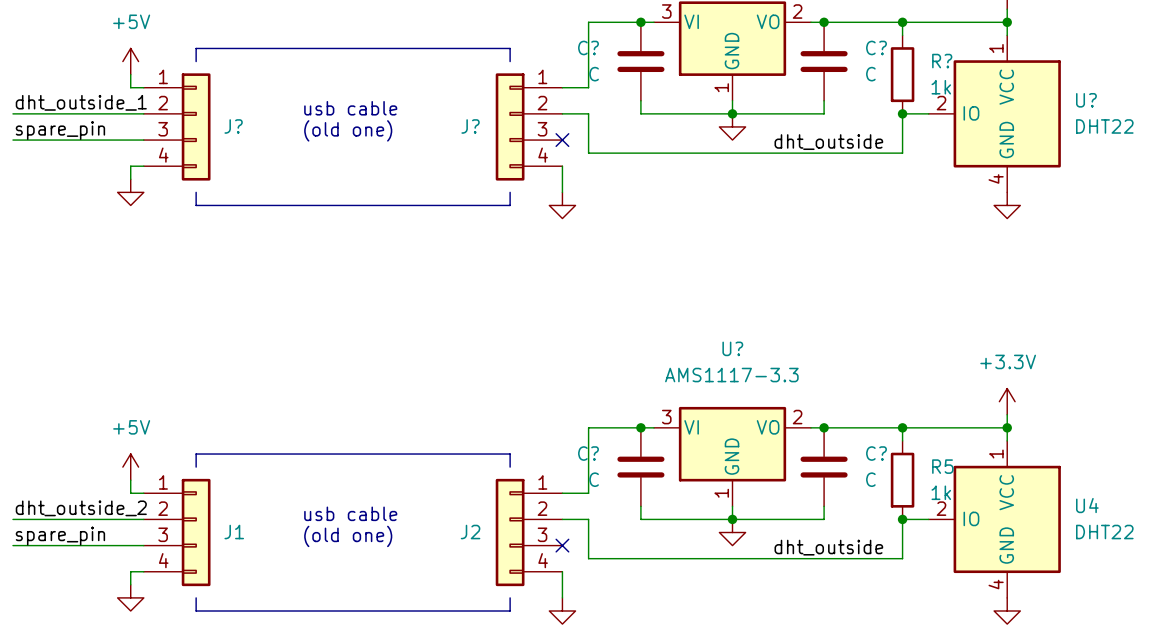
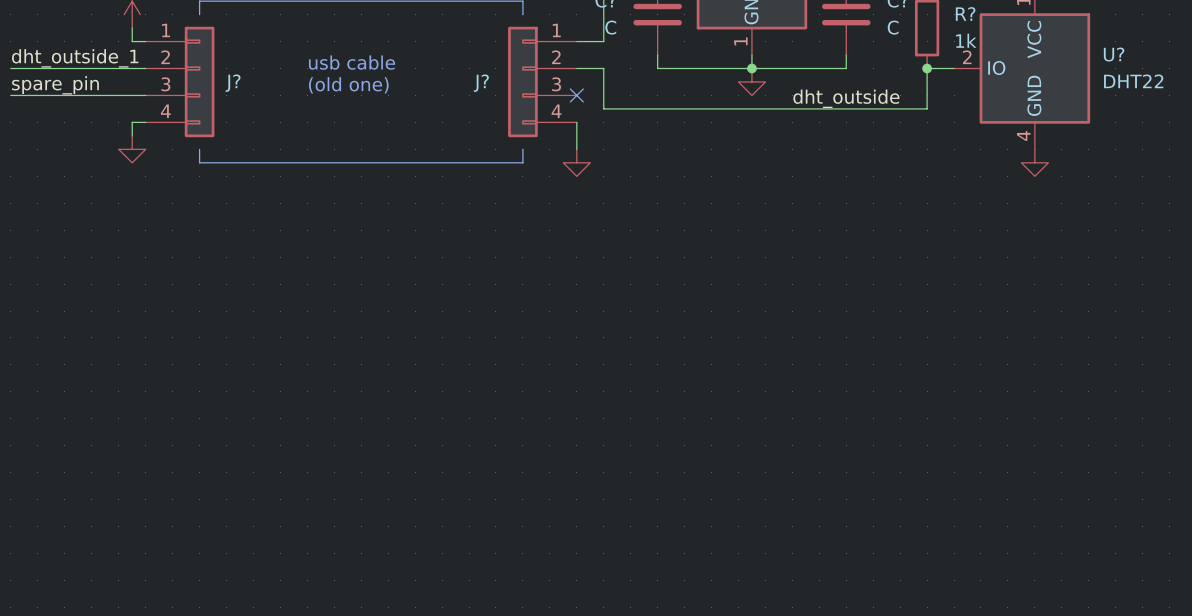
power symbol: +3.3V (1007, 401) -> none
wire: (1007, 414) (1007, 440) -> none
junction: (640, 427) -> none
wire: (654, 427) (588, 427) (588, 493) (562, 493) -> none
wire: (810, 427) (1007, 427) -> none
junction: (824, 427) -> none
wire: (902, 427) (902, 440) -> none
junction: (902, 427) -> none
junction: (1007, 427) -> none
U?: AMS1117-3.3 (732, 456) -> none
power symbol: +5V (130, 467) -> none
line: (196, 467) (196, 454) (510, 454) (510, 467) -> none
C?: C (640, 467) -> none
C?: C (824, 467) -> none
wire: (130, 480) (130, 493) (143, 493) -> none
R5: 1k (902, 480) -> none
wire: (640, 506) (640, 519) (824, 519) (824, 506) -> none
wire: (732, 506) (732, 519) -> none
label: dht_outside_2 (81, 508) -> none
text: usb cable (350, 513) -> none
wire: (12, 519) (143, 519) -> none
wire: (562, 519) (588, 519) (588, 558) (902, 558) (902, 519) (928, 519) -> none
junction: (732, 519) -> none
junction: (902, 519) -> none
U4: DHT22 (994, 519) -> none
J1: (177, 532) -> none
J2: (529, 532) -> none
power symbol: (732, 532) -> none
label: spare_pin (60, 536) -> none
text: (old one) (348, 536) -> none
wire: (12, 545) (143, 545) -> none
no-connect mark: (562, 545) -> none
label: dht_outside (828, 547) -> none
wire: (143, 571) (130, 571) (130, 584) -> none
wire: (562, 571) (562, 597) -> none
power symbol: (130, 597) -> none
line: (196, 597) (196, 611) (510, 611) (510, 597) -> none
power symbol: (562, 611) -> none
power symbol: (1007, 611) -> none

